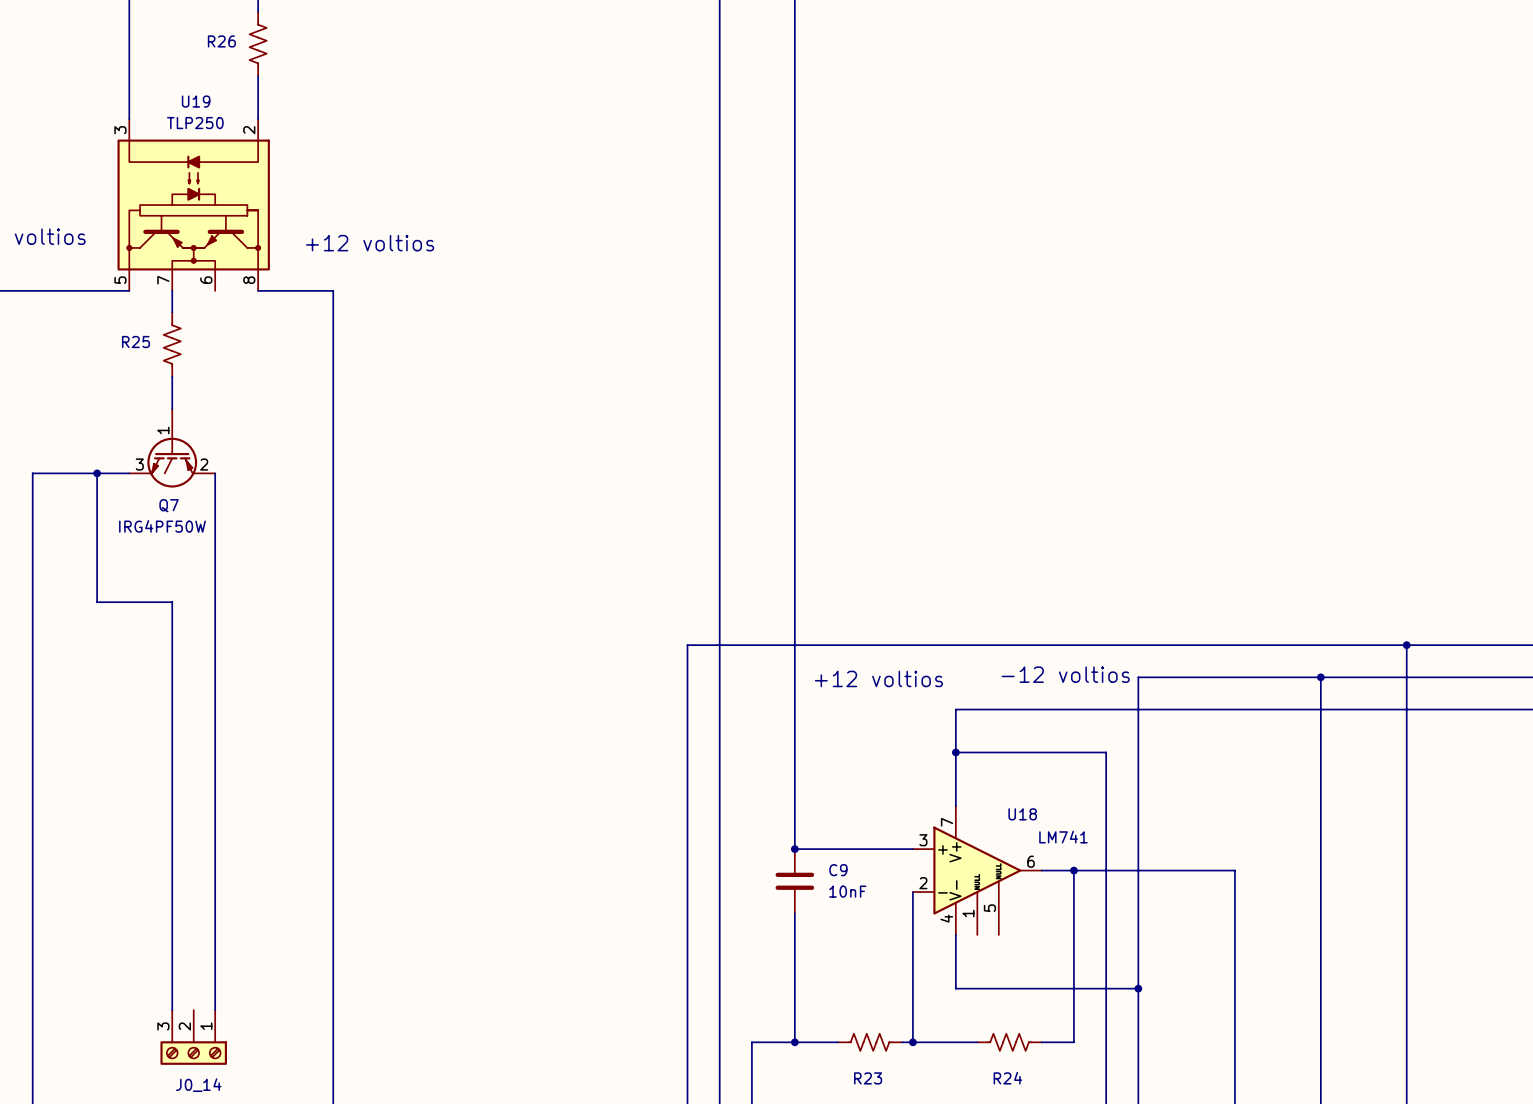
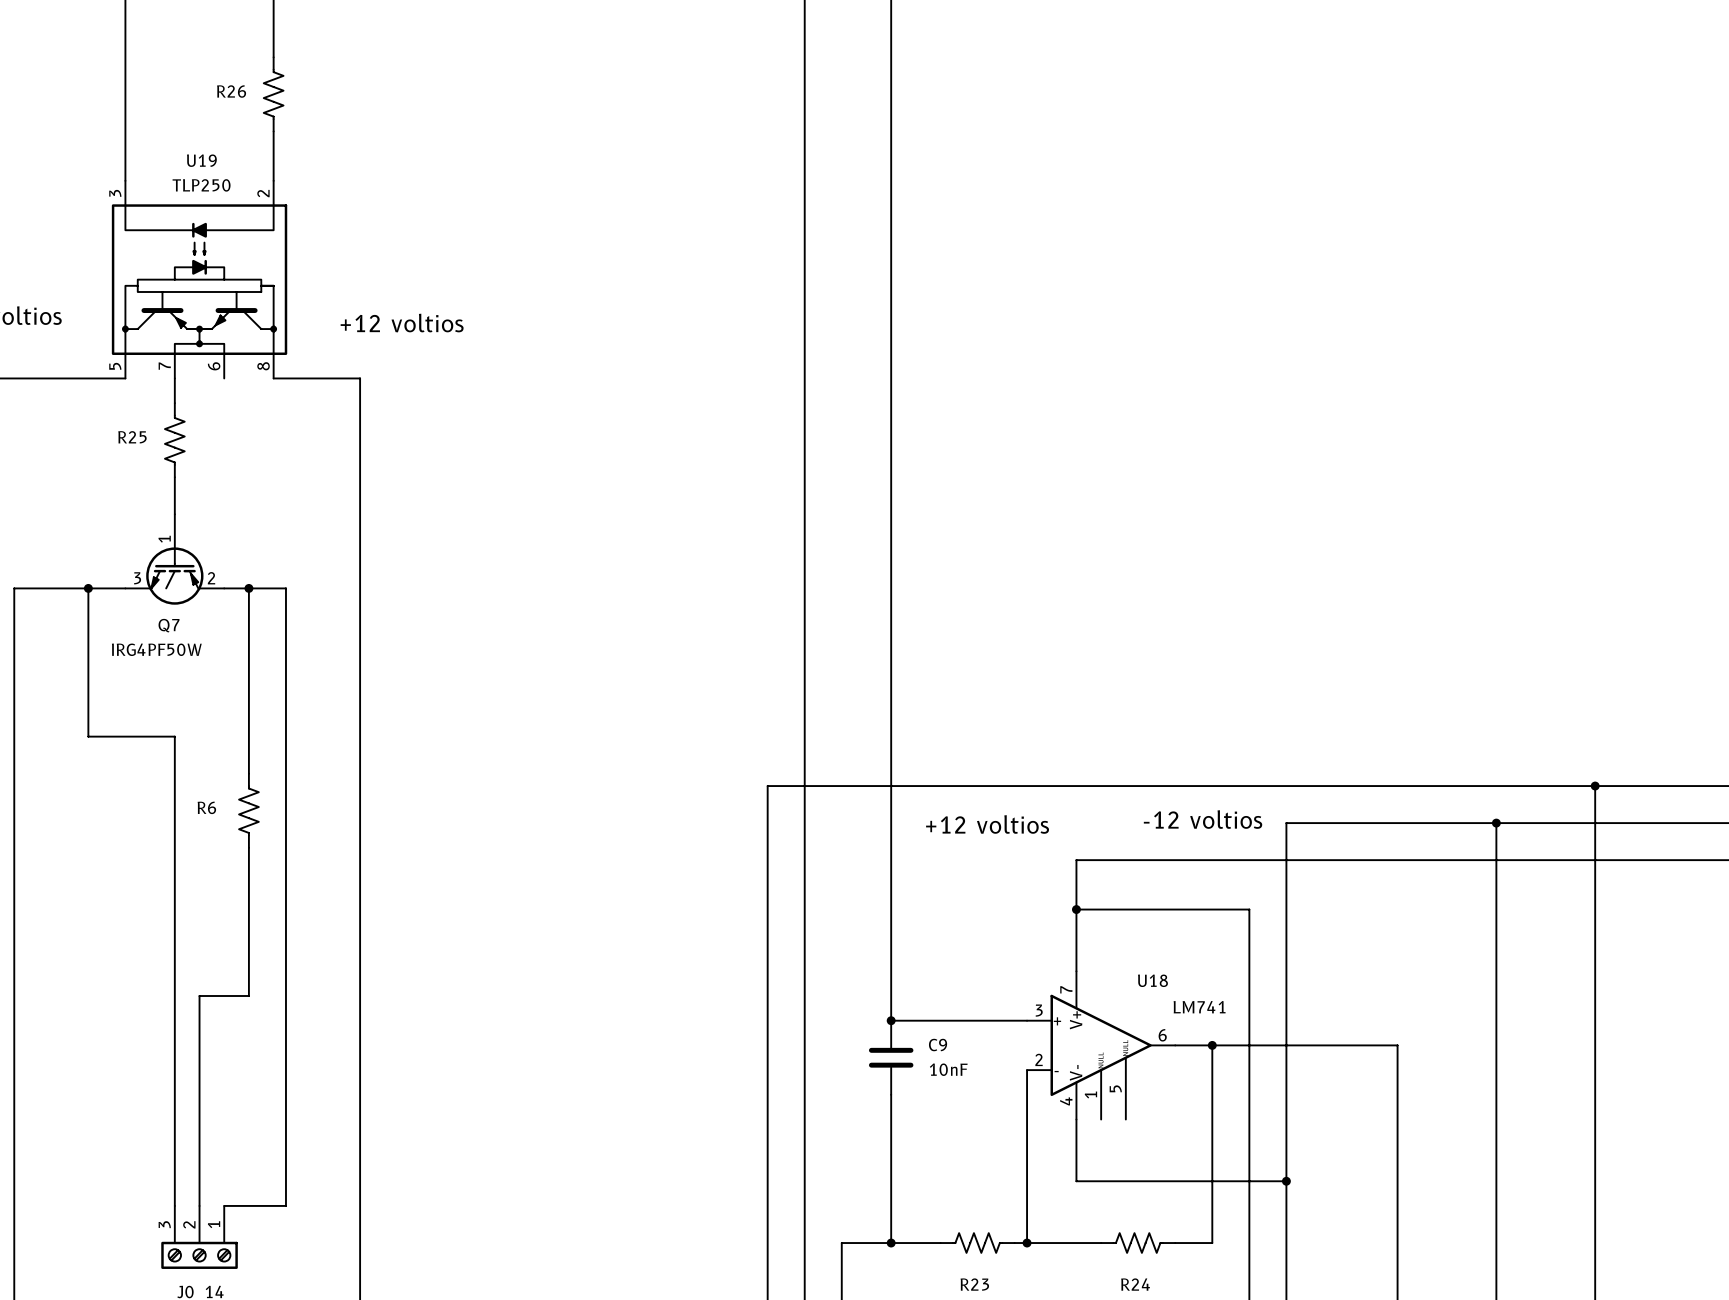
wire: (215, 473) (215, 1010) -> (224, 588) (285, 588) (285, 1205) (224, 1205)
wire: none -> (248, 588) (248, 773)
junction: none -> (248, 588)
R6: none -> (248, 810)
wire: none -> (248, 847) (248, 996) (199, 996) (199, 1205)

